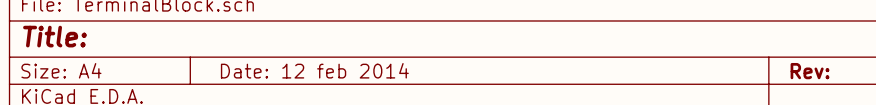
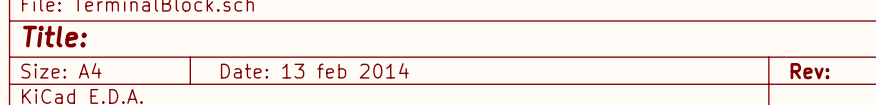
title block: Date: 12 feb 2014 (314, 70) -> Date: 13 feb 2014 (314, 70)

